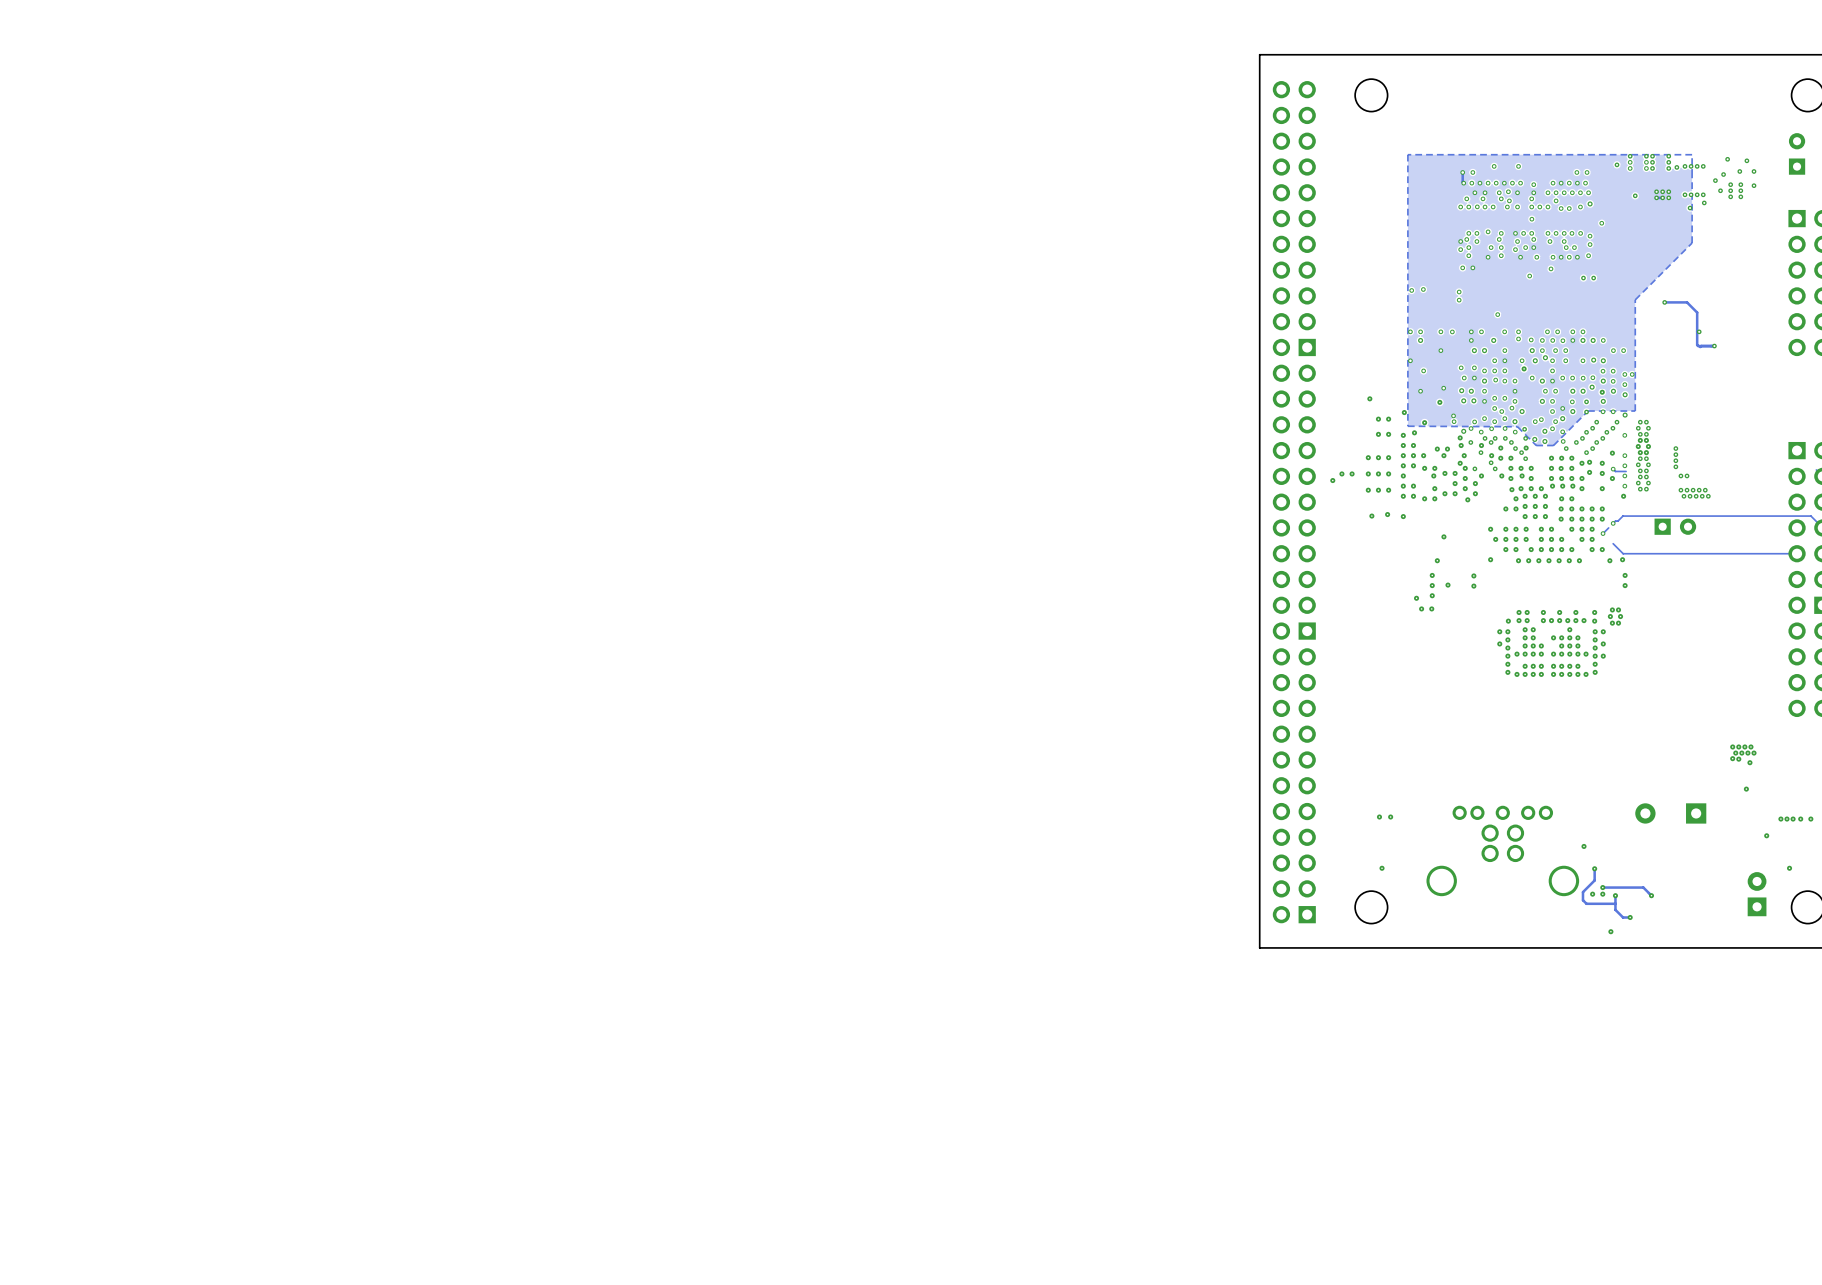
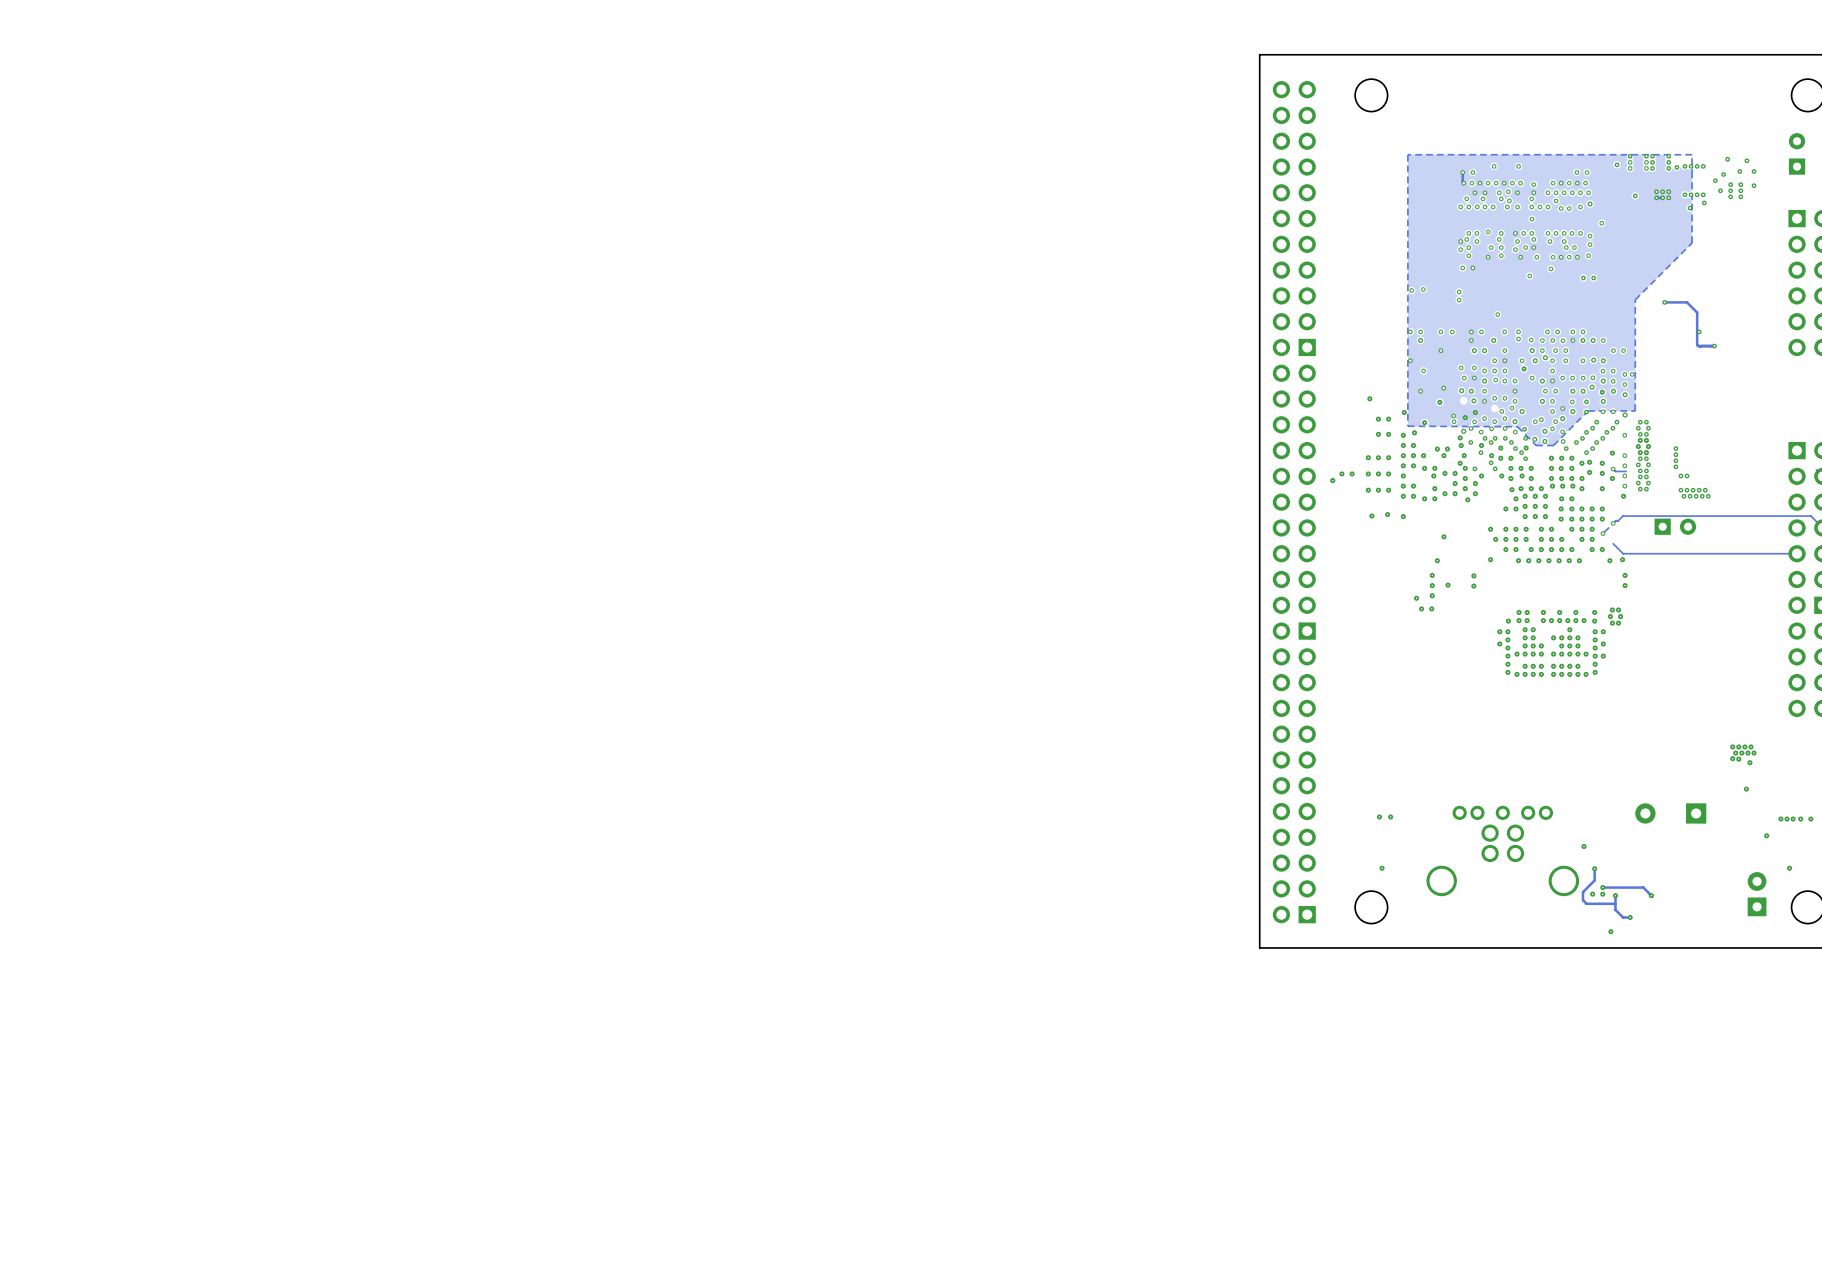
via: (1463, 400) -> none
via: (1494, 408) -> none
via: none -> (1475, 412)
via: none -> (1465, 417)

